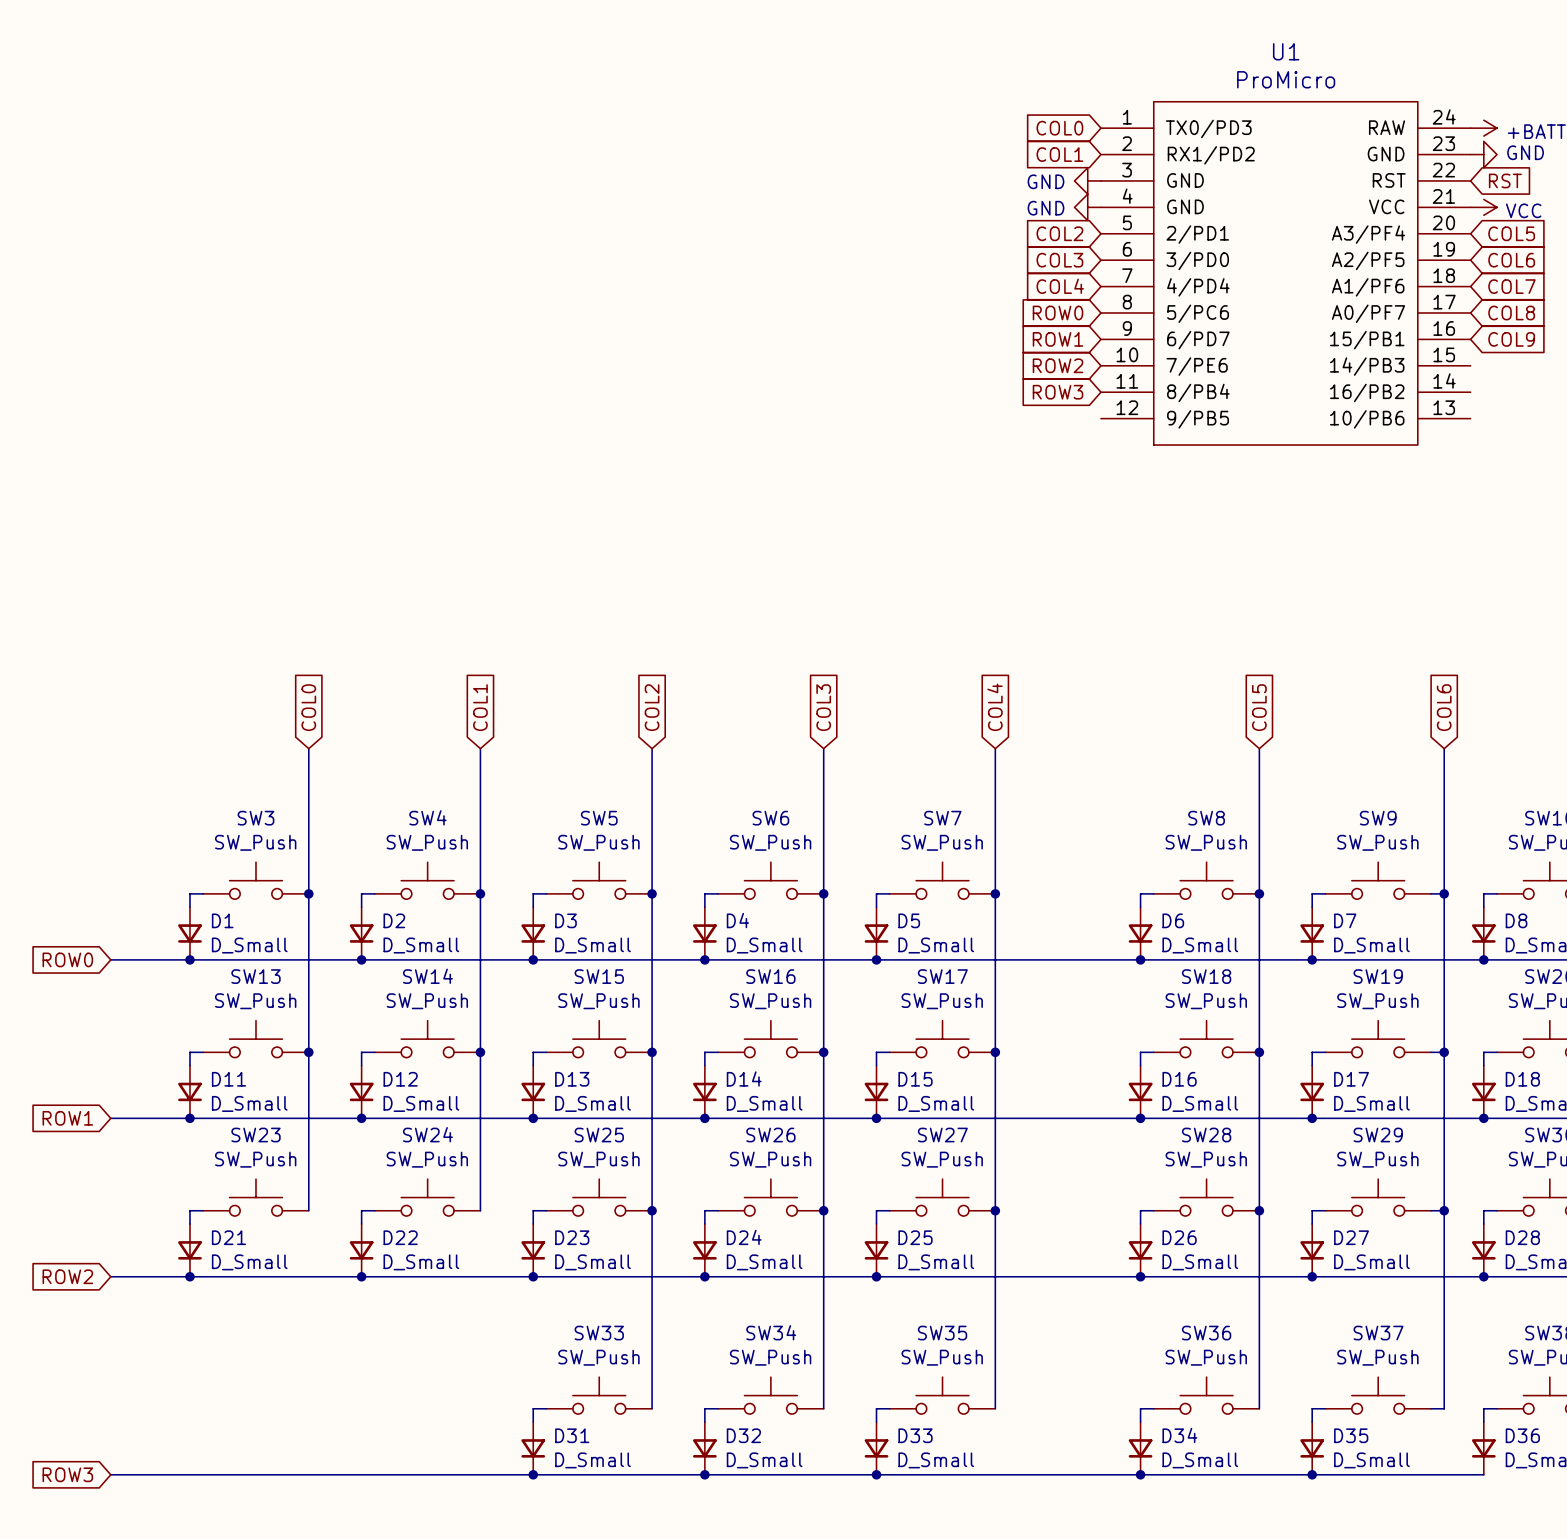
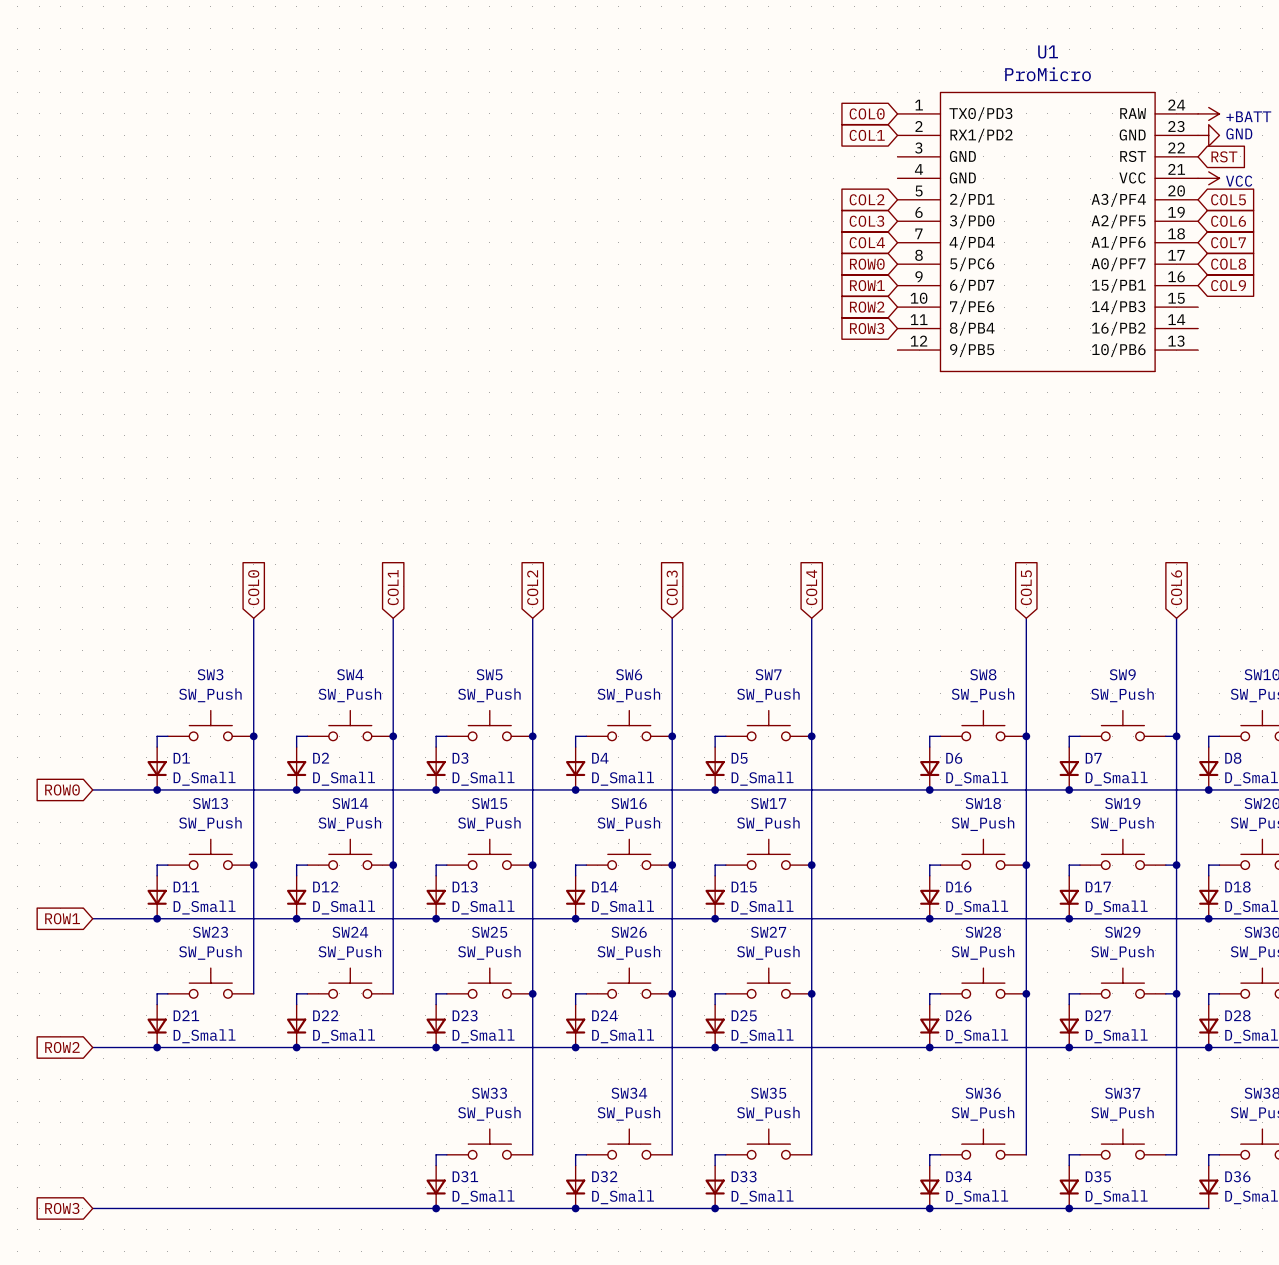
power symbol: GND (1087, 180) -> none
power symbol: GND (1087, 207) -> none

